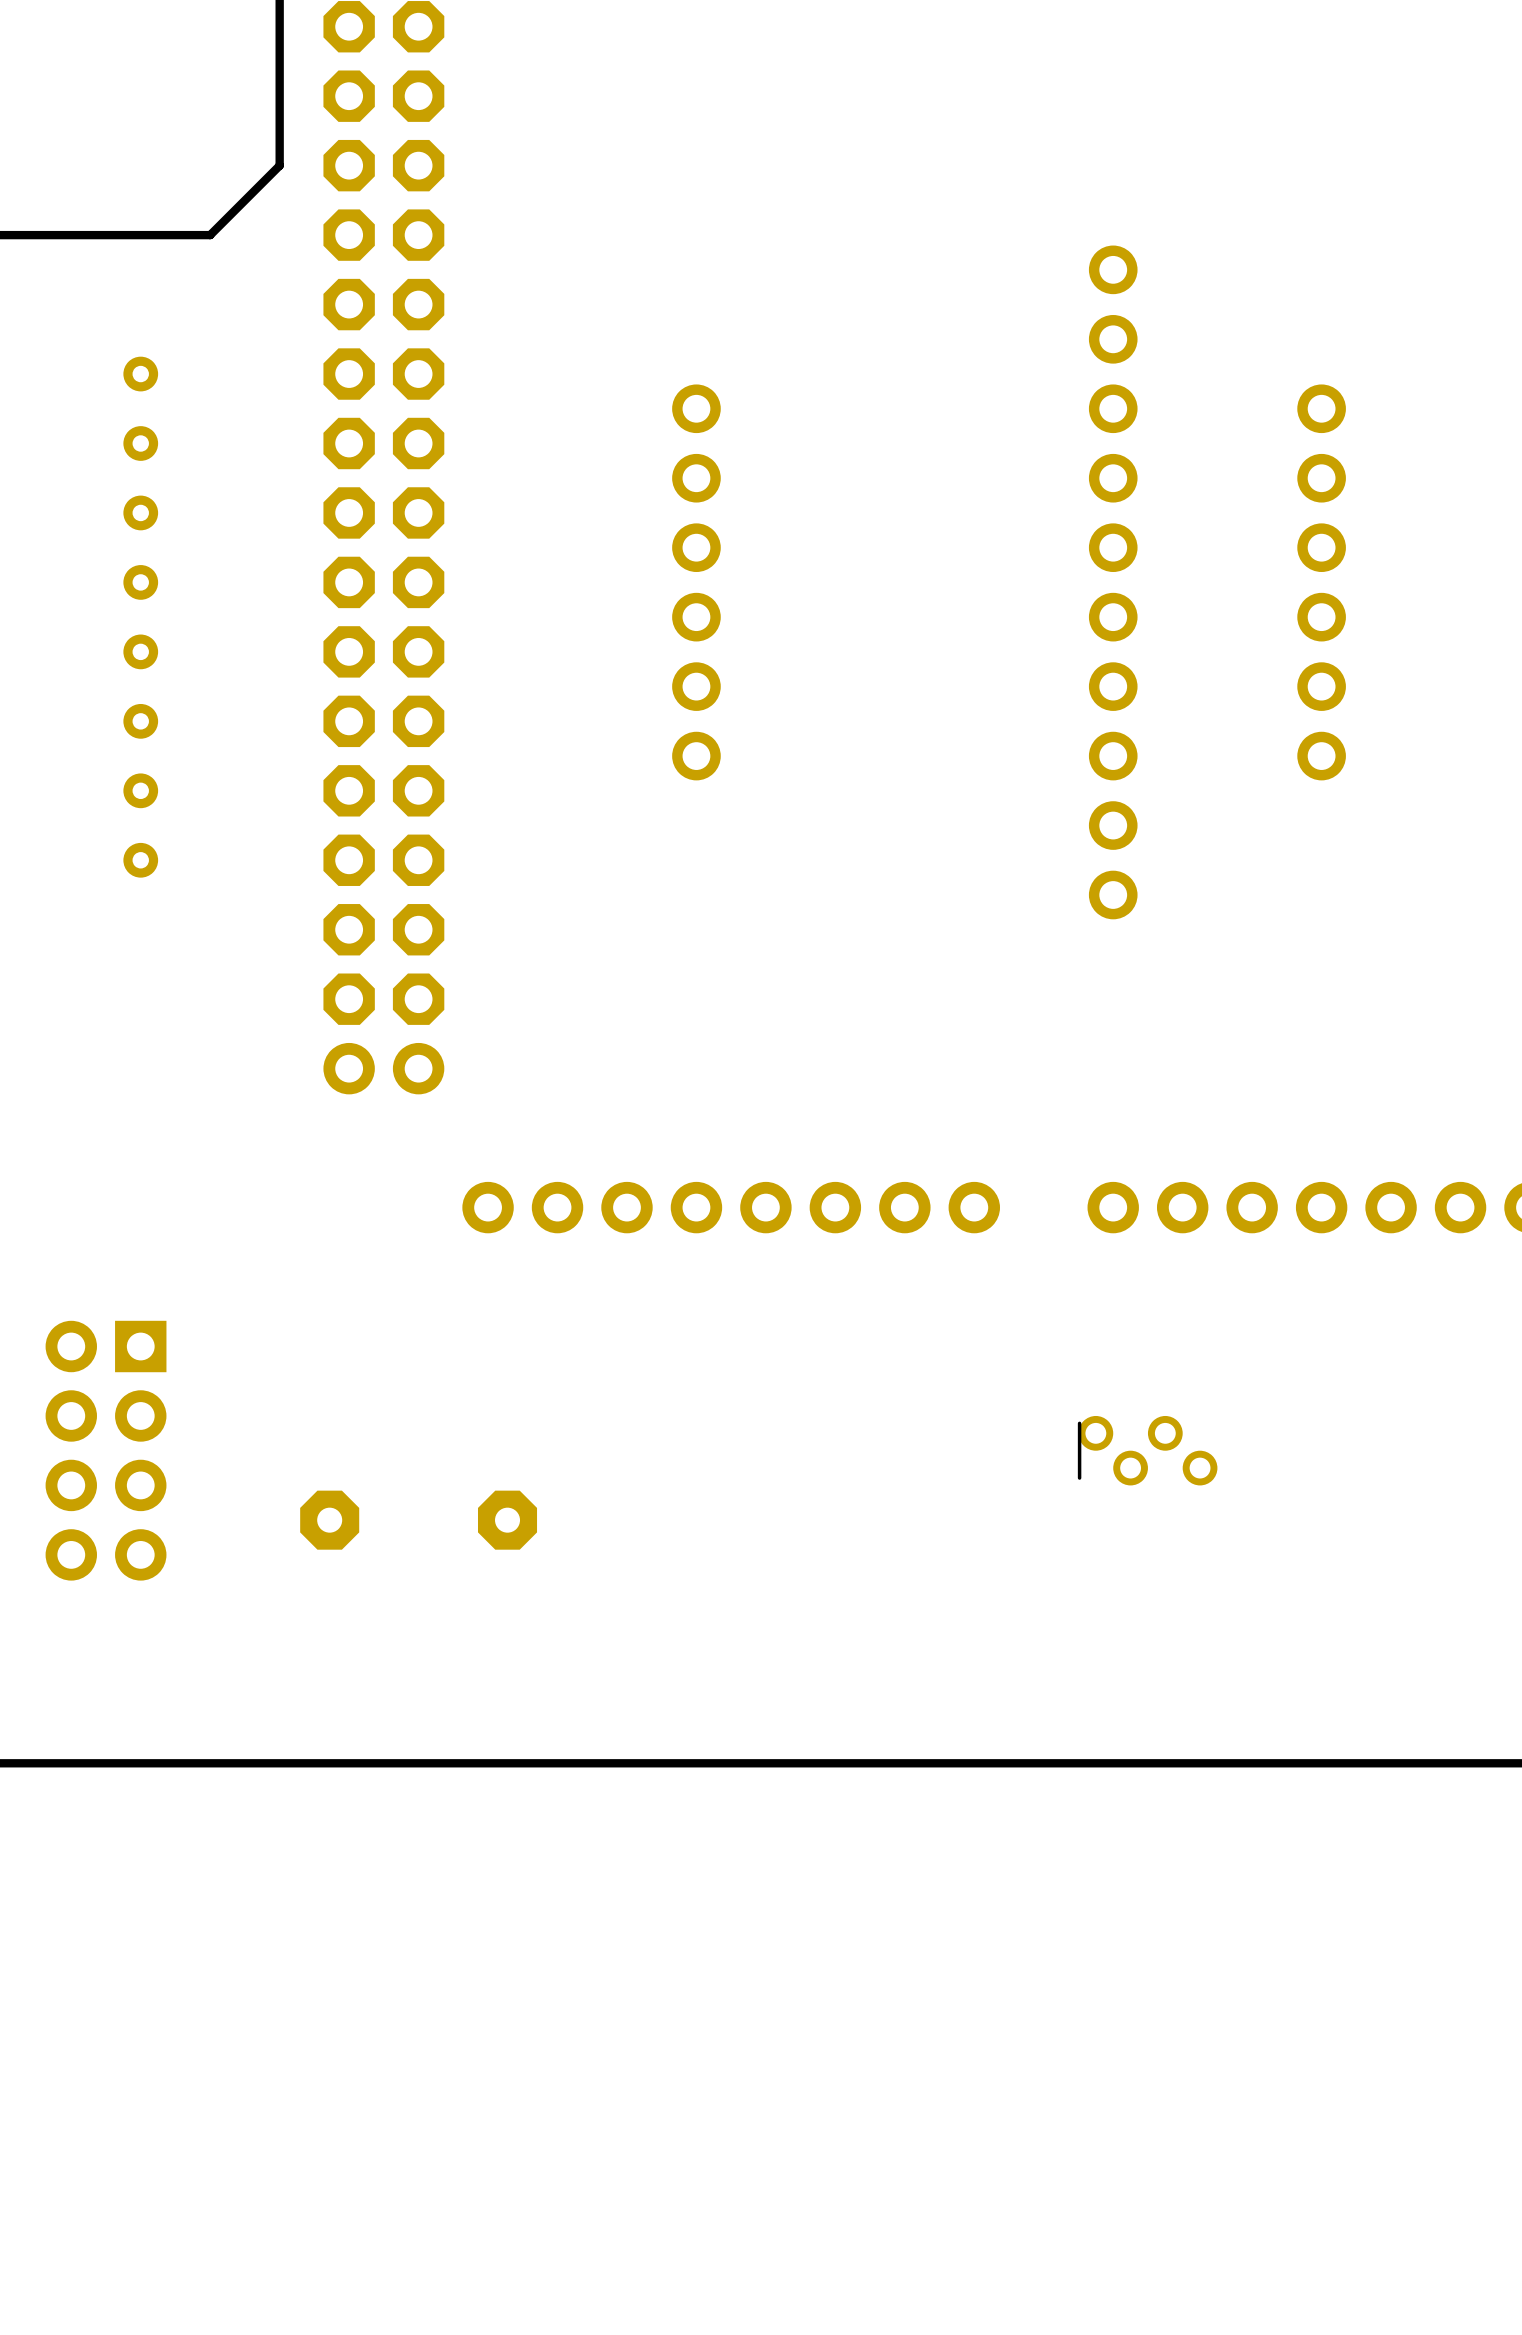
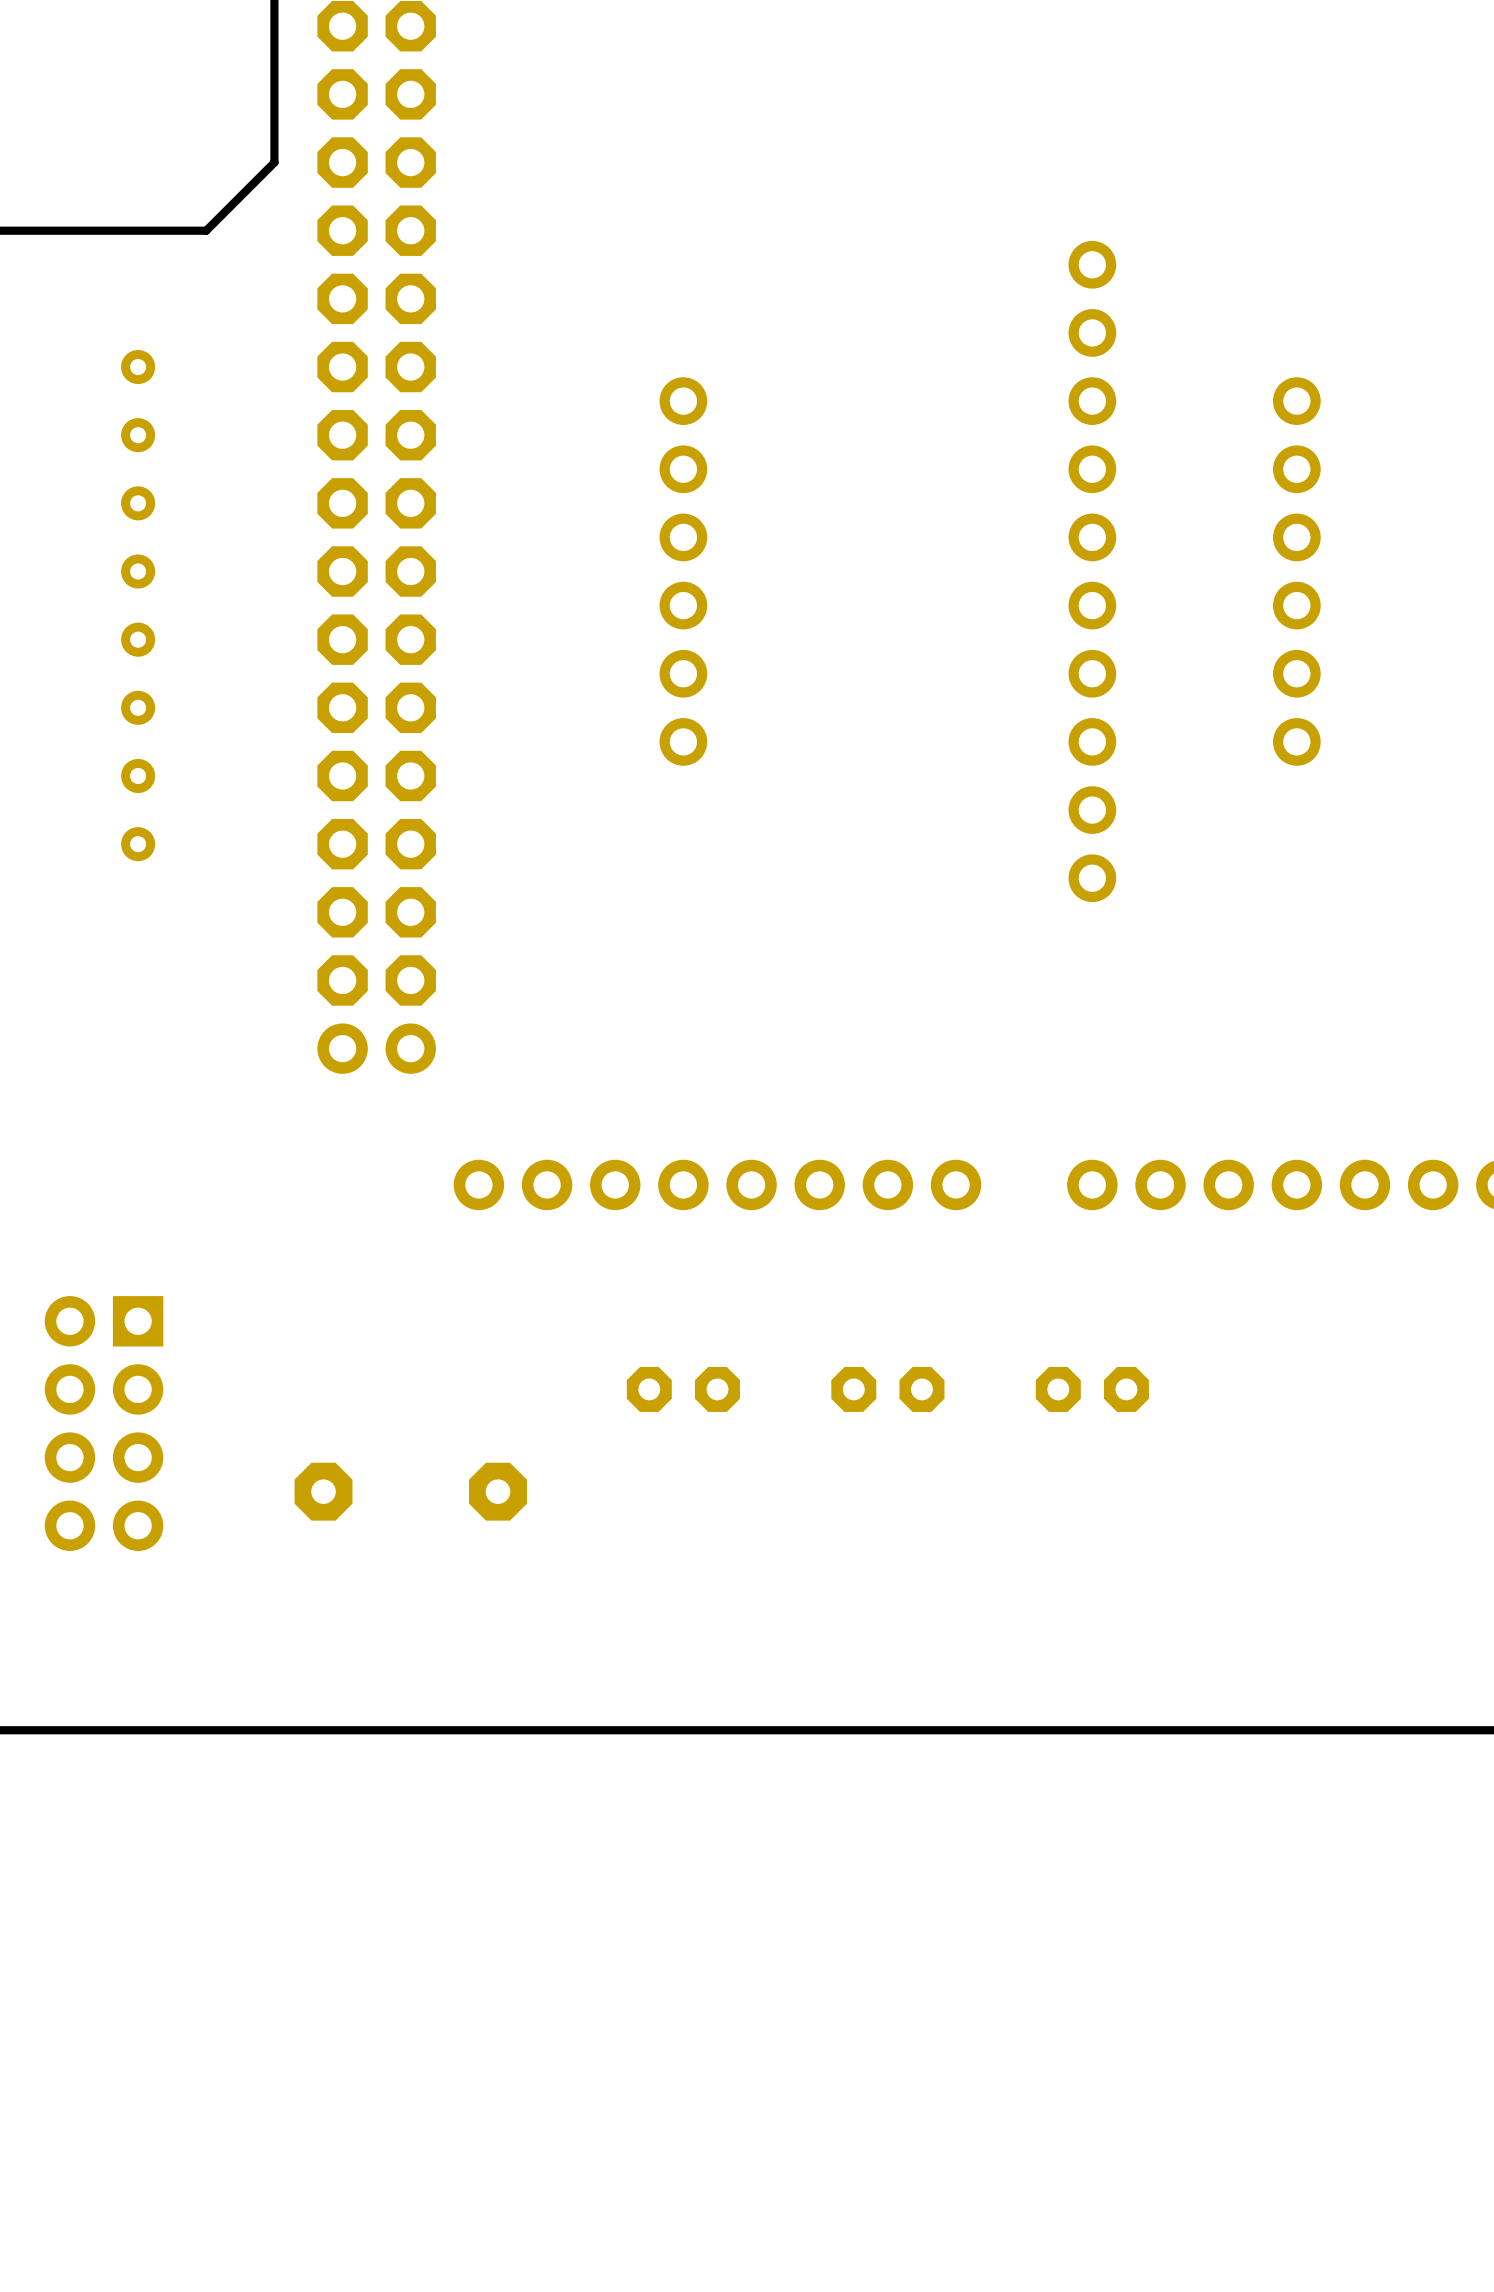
part: none -> (683, 1389)
part: none -> (887, 1389)
part: none -> (1092, 1389)
part: (1147, 1450) -> none

